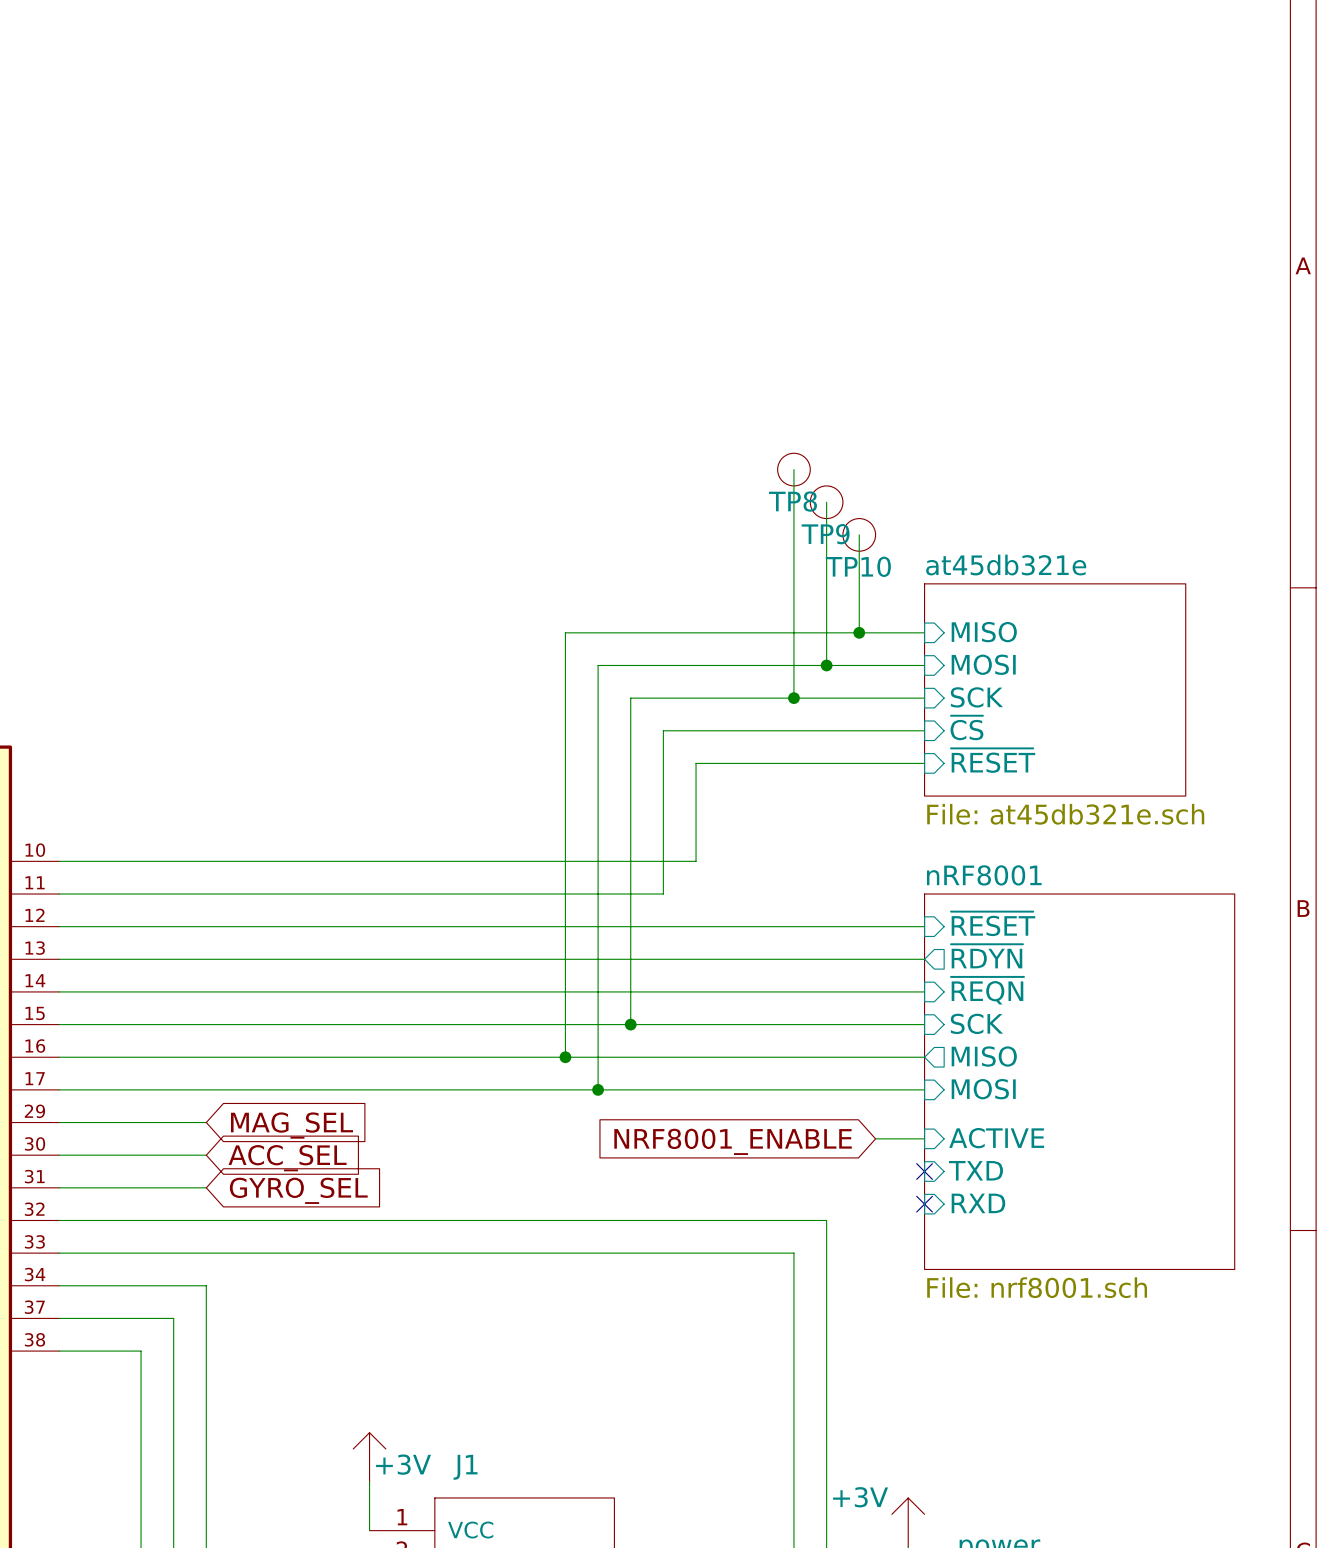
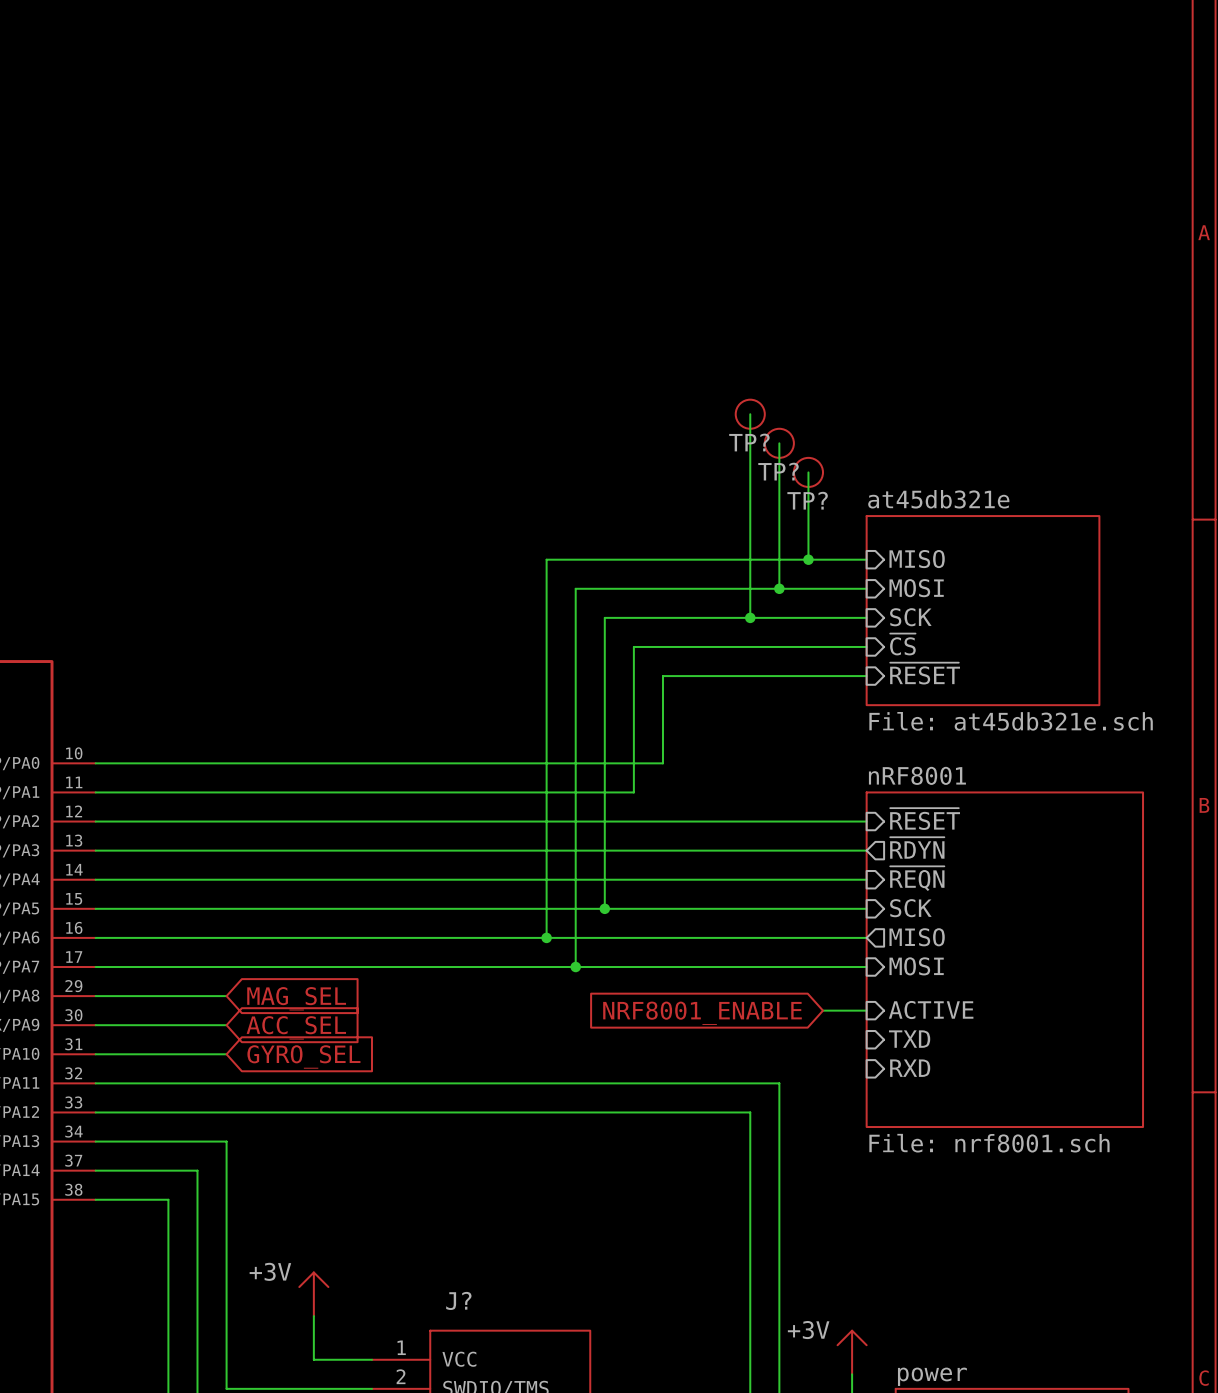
TP8 name: TP8 (793, 501) -> TP? (749, 442)
TP9 name: TP9 (825, 534) -> TP? (778, 471)
TP10 name: TP10 (858, 566) -> TP? (807, 500)
no-connect mark: (924, 1171) -> none
no-connect mark: (924, 1204) -> none
power symbol position: +3V (369, 1457) -> +3V (313, 1294)
power symbol text position: +3V (403, 1464) -> +3V (270, 1271)
J1 name: J1 (465, 1467) -> J? (458, 1300)
wire: (369, 1481) (369, 1530) -> (313, 1316) (313, 1359) (372, 1359)

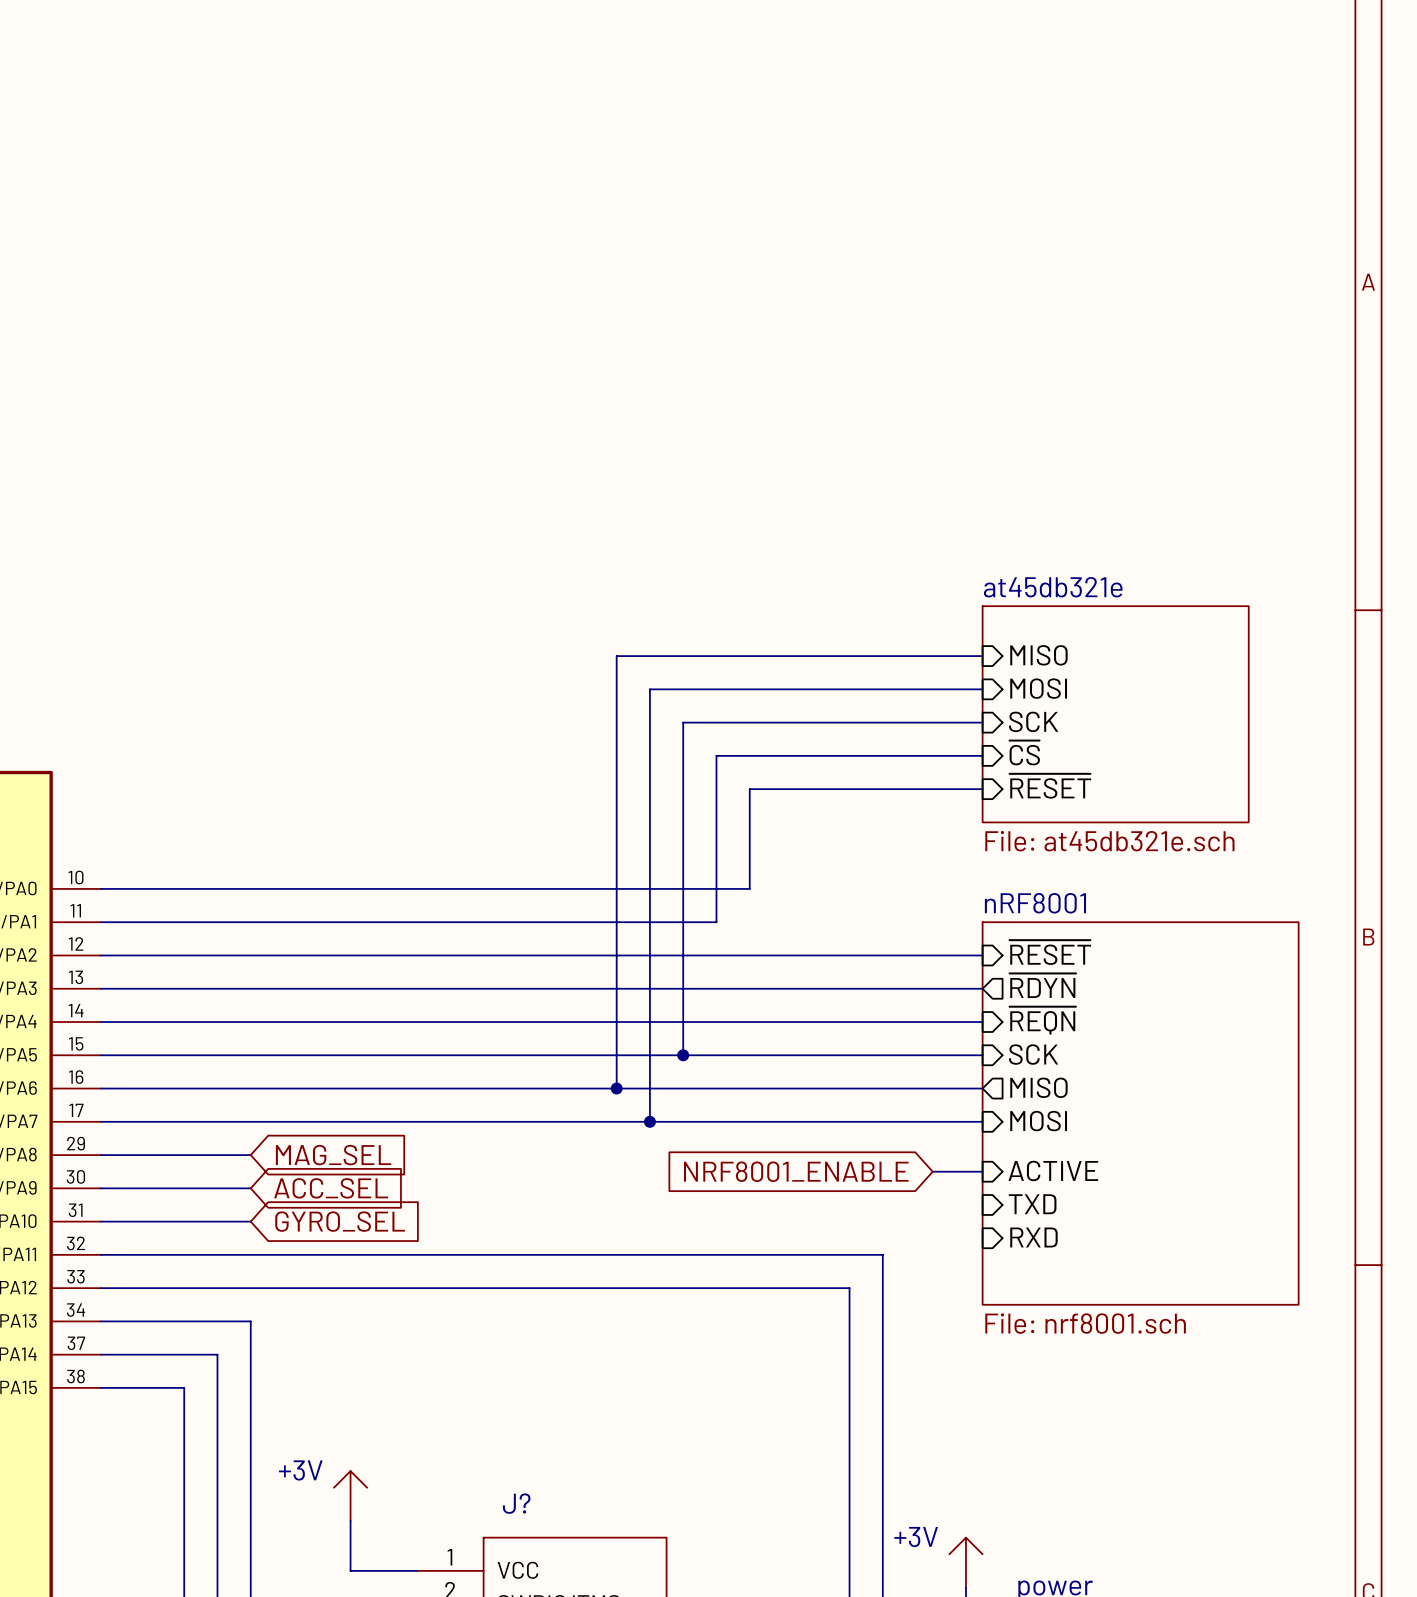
wire: (750, 414) (750, 617) -> none
TP?: (750, 414) -> none
wire: (779, 443) (779, 588) -> none
TP?: (779, 443) -> none
wire: (808, 472) (808, 559) -> none
TP?: (808, 472) -> none
junction: (808, 559) -> none
junction: (779, 588) -> none
junction: (750, 617) -> none

